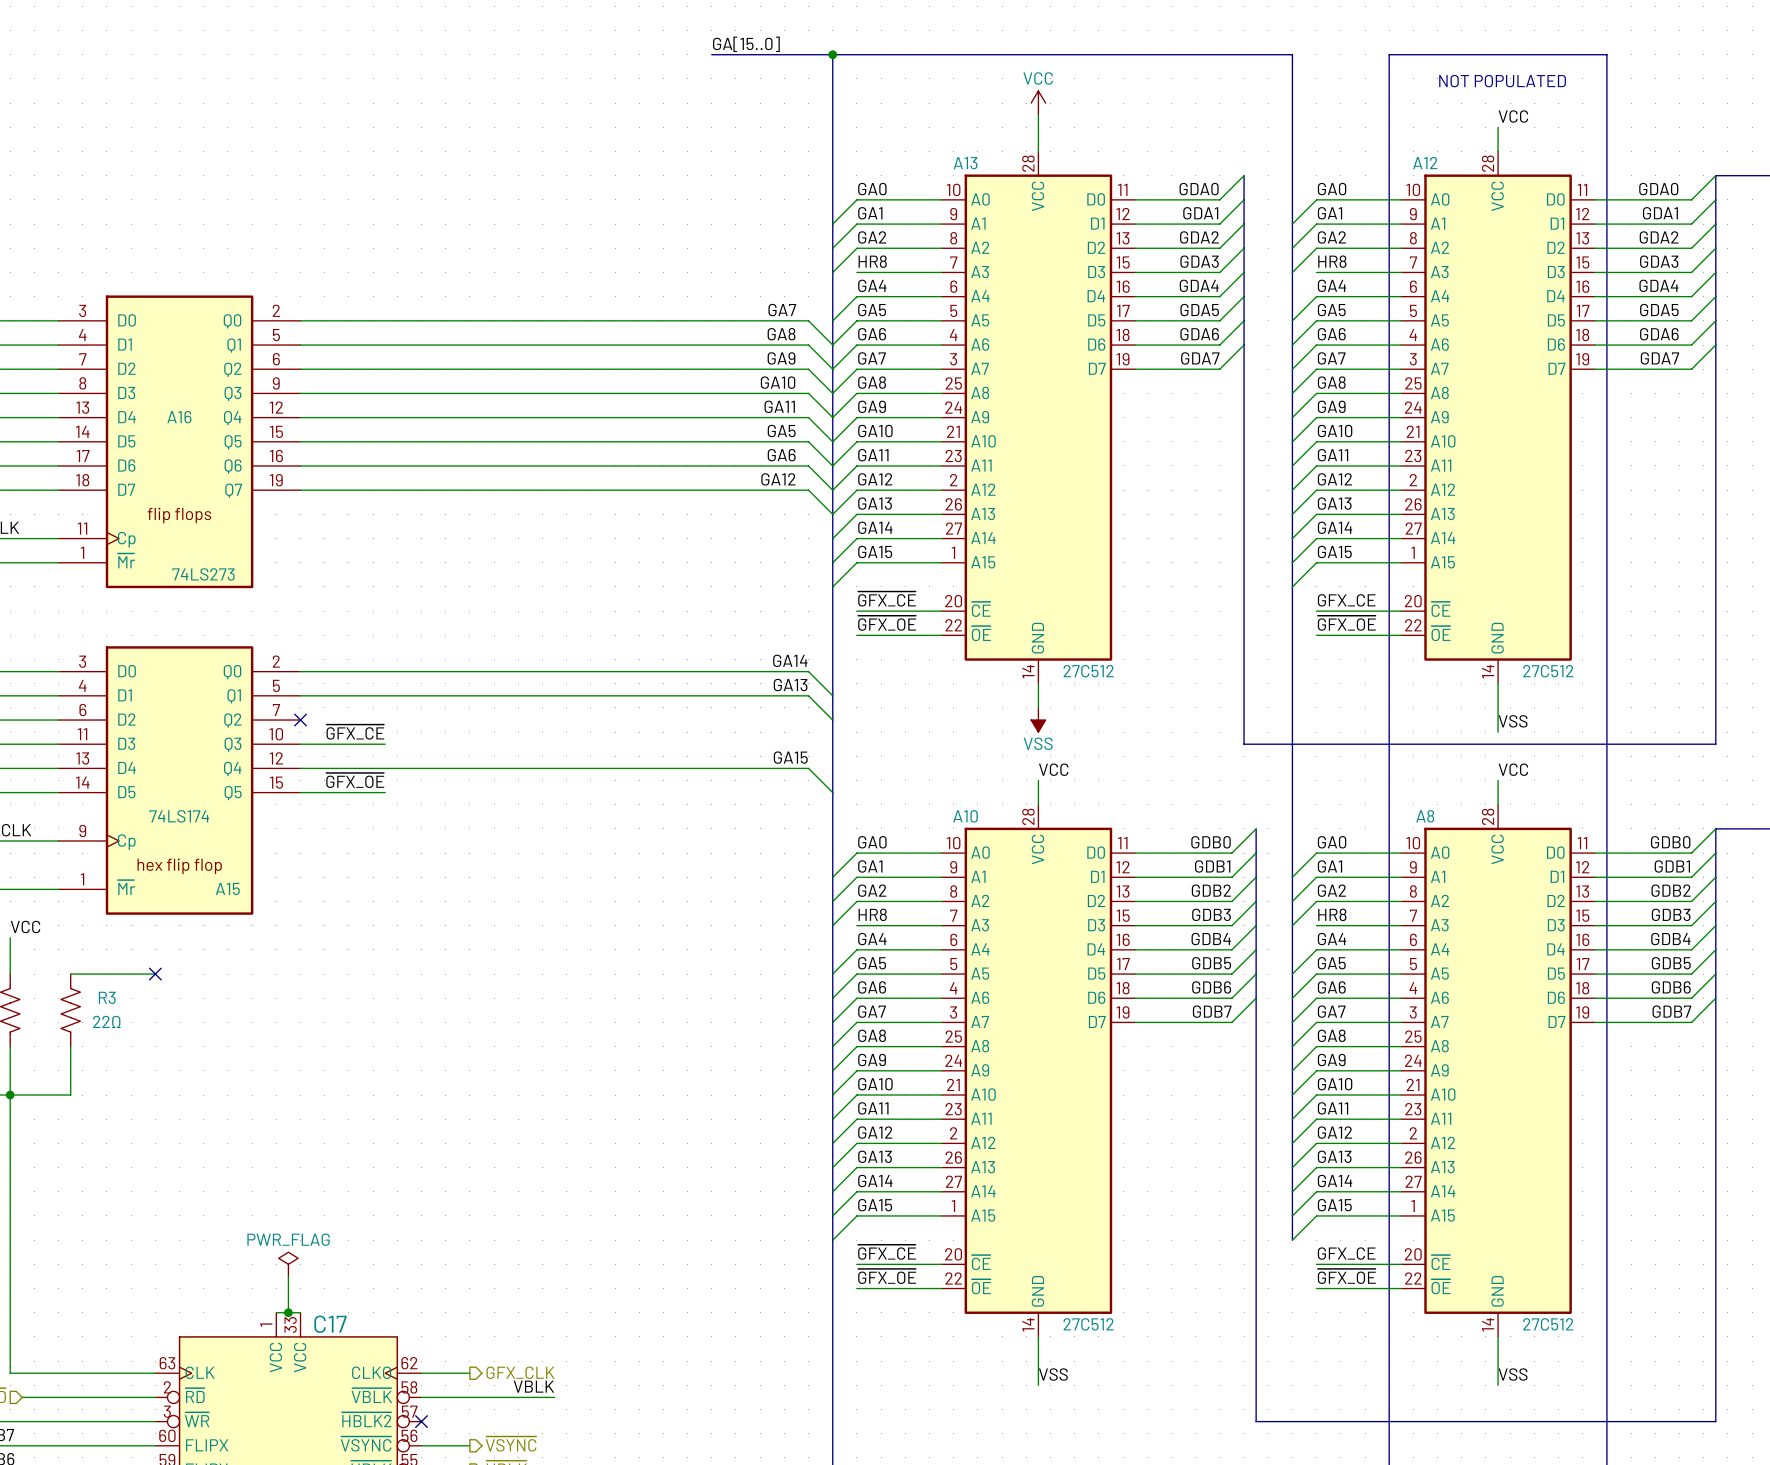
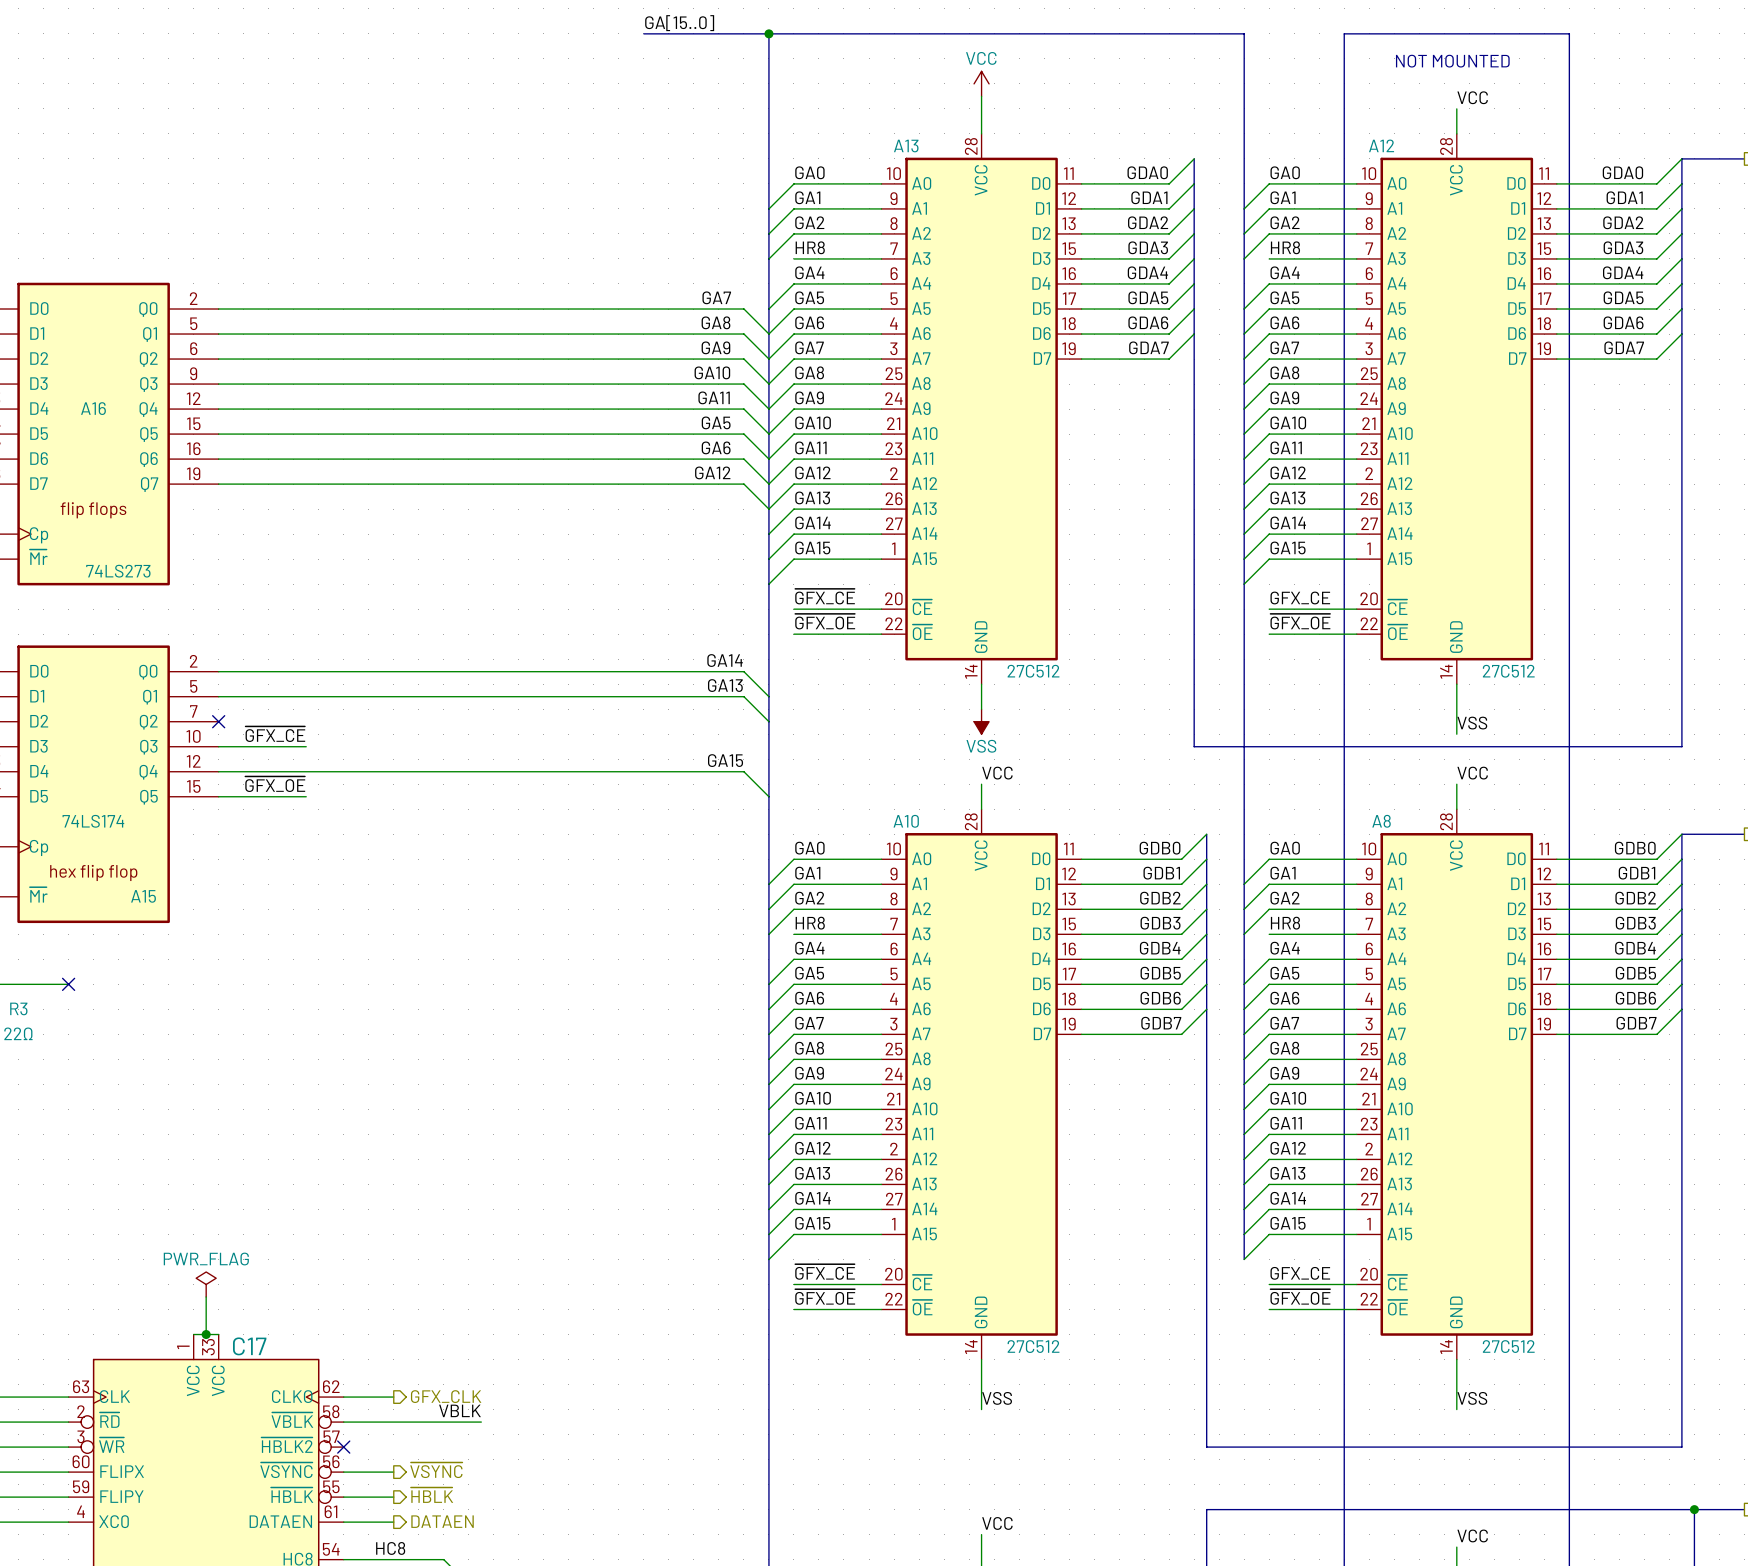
text: NOT POPULATED (1502, 81) -> NOT MOUNTED (1452, 61)

